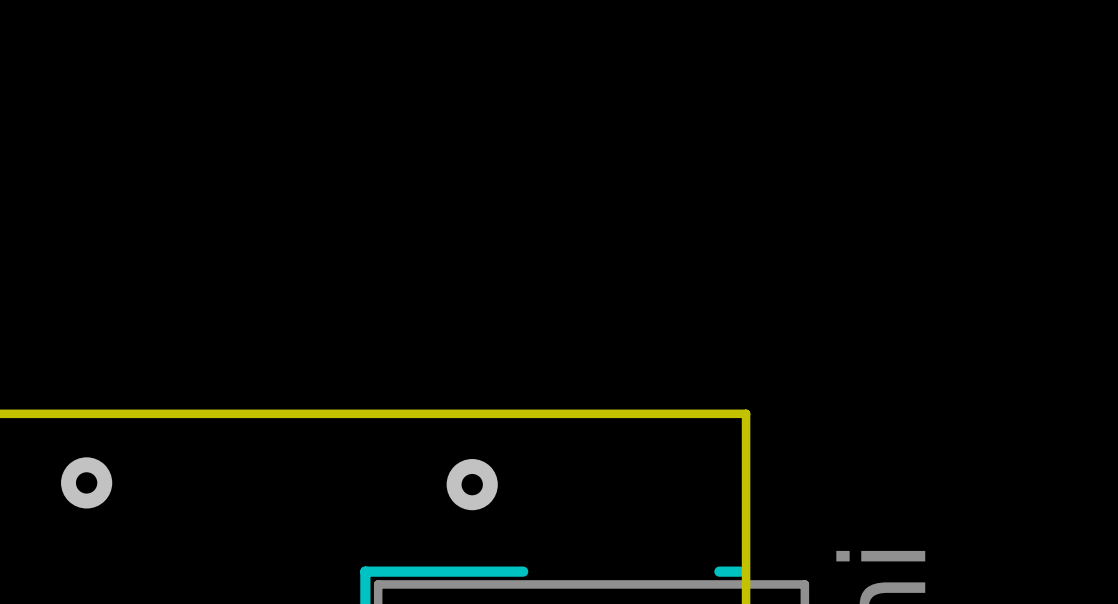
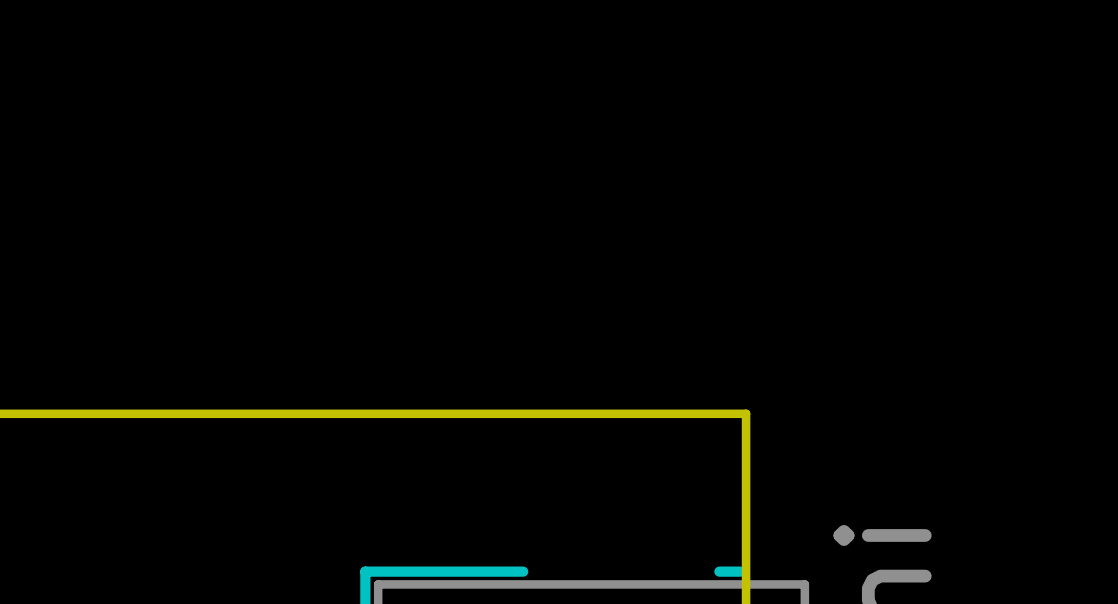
via: (86, 482) -> none
via: (472, 484) -> none

